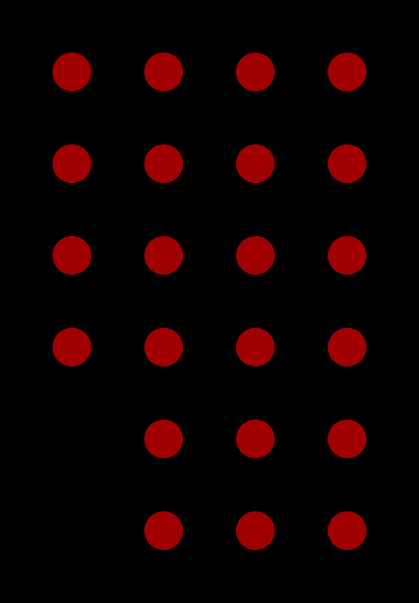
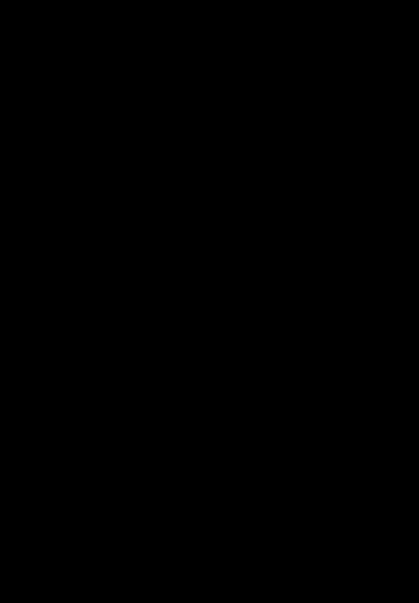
part: (71, 71) -> none
part: (163, 71) -> none
part: (255, 71) -> none
part: (347, 71) -> none
part: (71, 163) -> none
part: (163, 163) -> none
part: (255, 163) -> none
part: (347, 163) -> none
part: (71, 255) -> none
part: (163, 255) -> none
part: (255, 255) -> none
part: (347, 255) -> none
part: (71, 347) -> none
part: (163, 347) -> none
part: (255, 347) -> none
part: (347, 347) -> none
part: (163, 438) -> none
part: (255, 438) -> none
part: (347, 438) -> none
part: (163, 530) -> none
part: (255, 530) -> none
part: (347, 530) -> none

